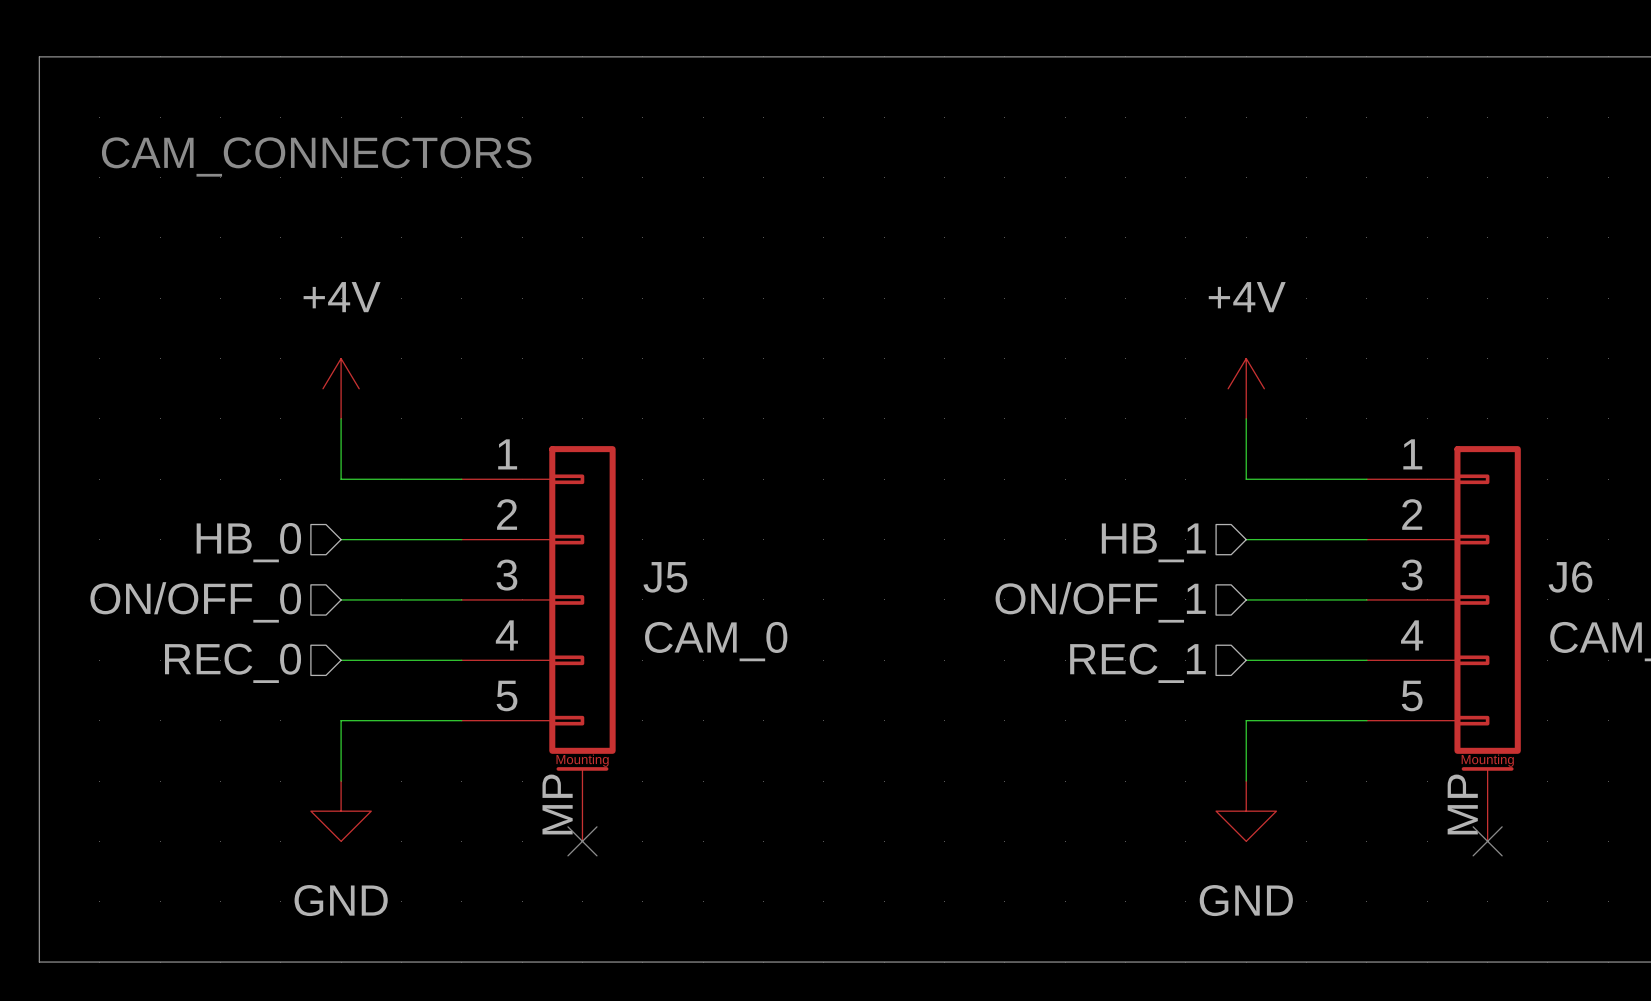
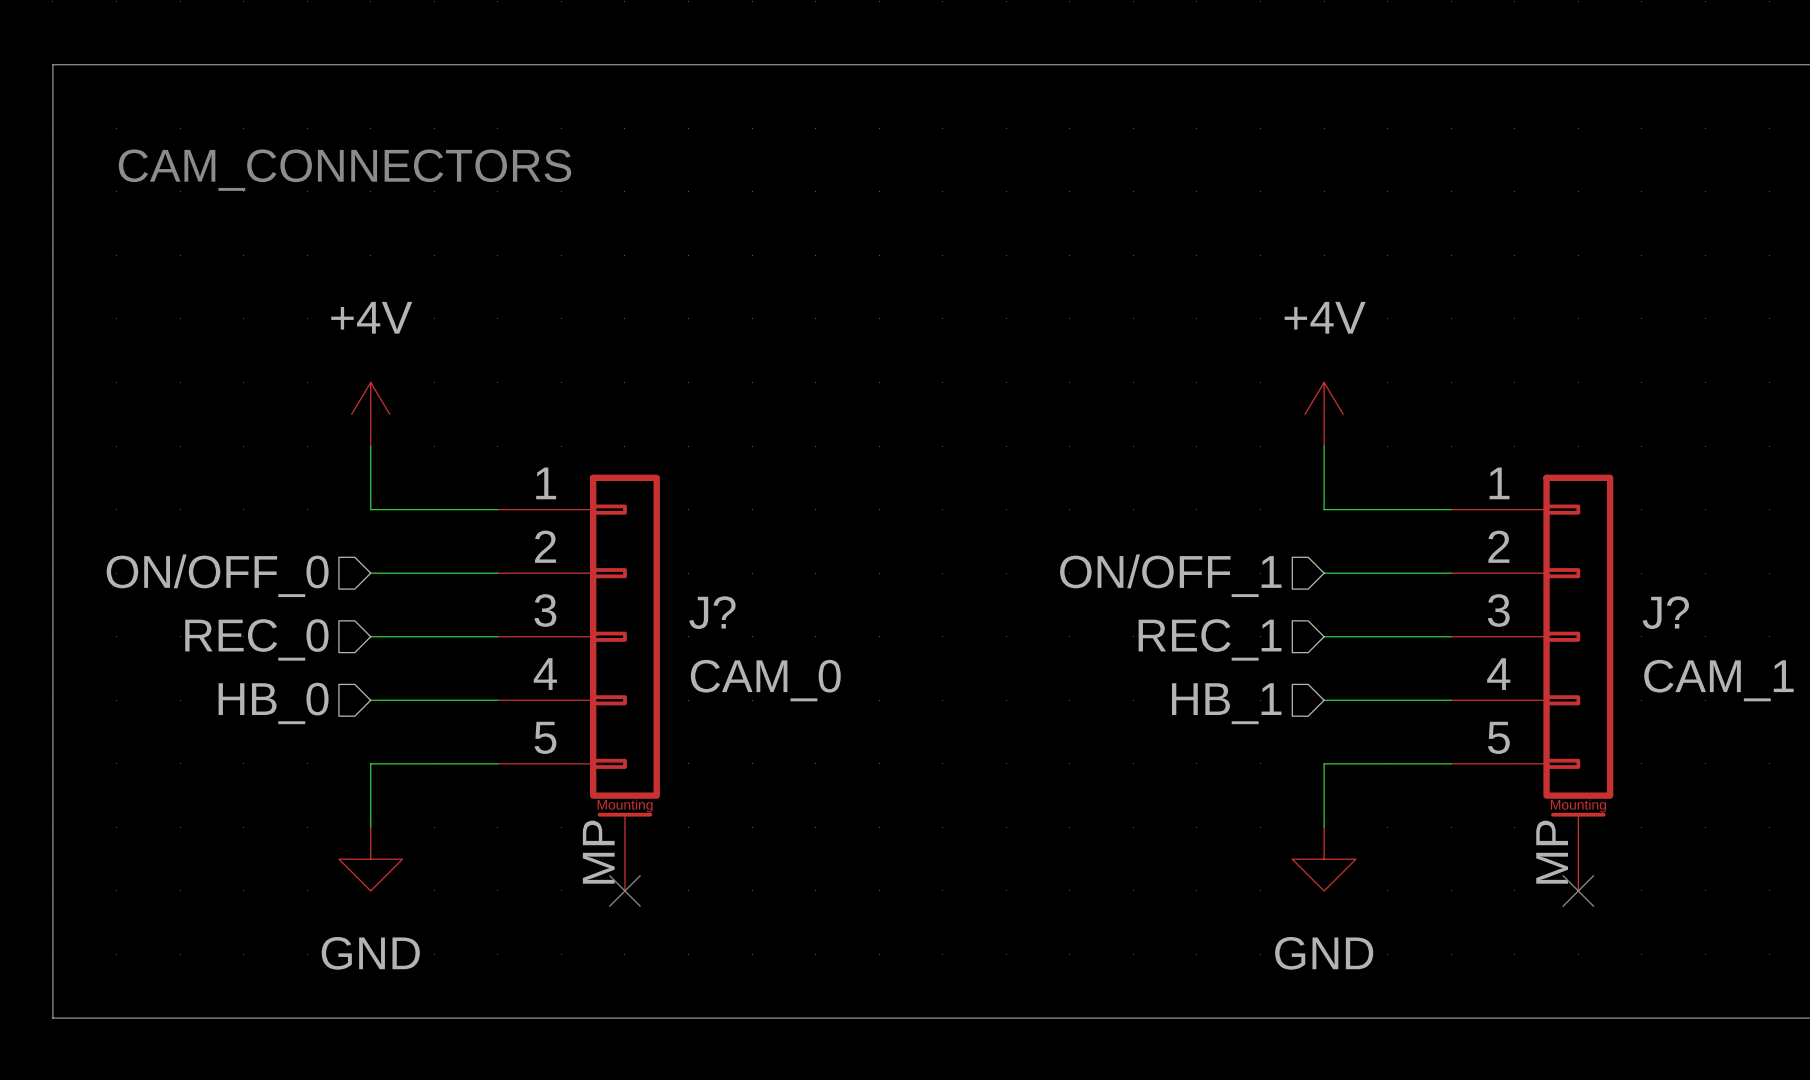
hierarchical label: HB_0 (248, 542) -> ON/OFF_0 (217, 575)
hierarchical label: HB_1 (1153, 542) -> ON/OFF_1 (1170, 575)
J5 name: J5 (665, 577) -> J? (712, 612)
J6 name: J6 (1570, 577) -> J? (1665, 612)
hierarchical label: ON/OFF_0 (195, 602) -> REC_0 (256, 639)
hierarchical label: ON/OFF_1 (1100, 602) -> REC_1 (1210, 639)
hierarchical label: REC_0 (233, 663) -> HB_0 (273, 703)
hierarchical label: REC_1 (1137, 663) -> HB_1 (1226, 703)

